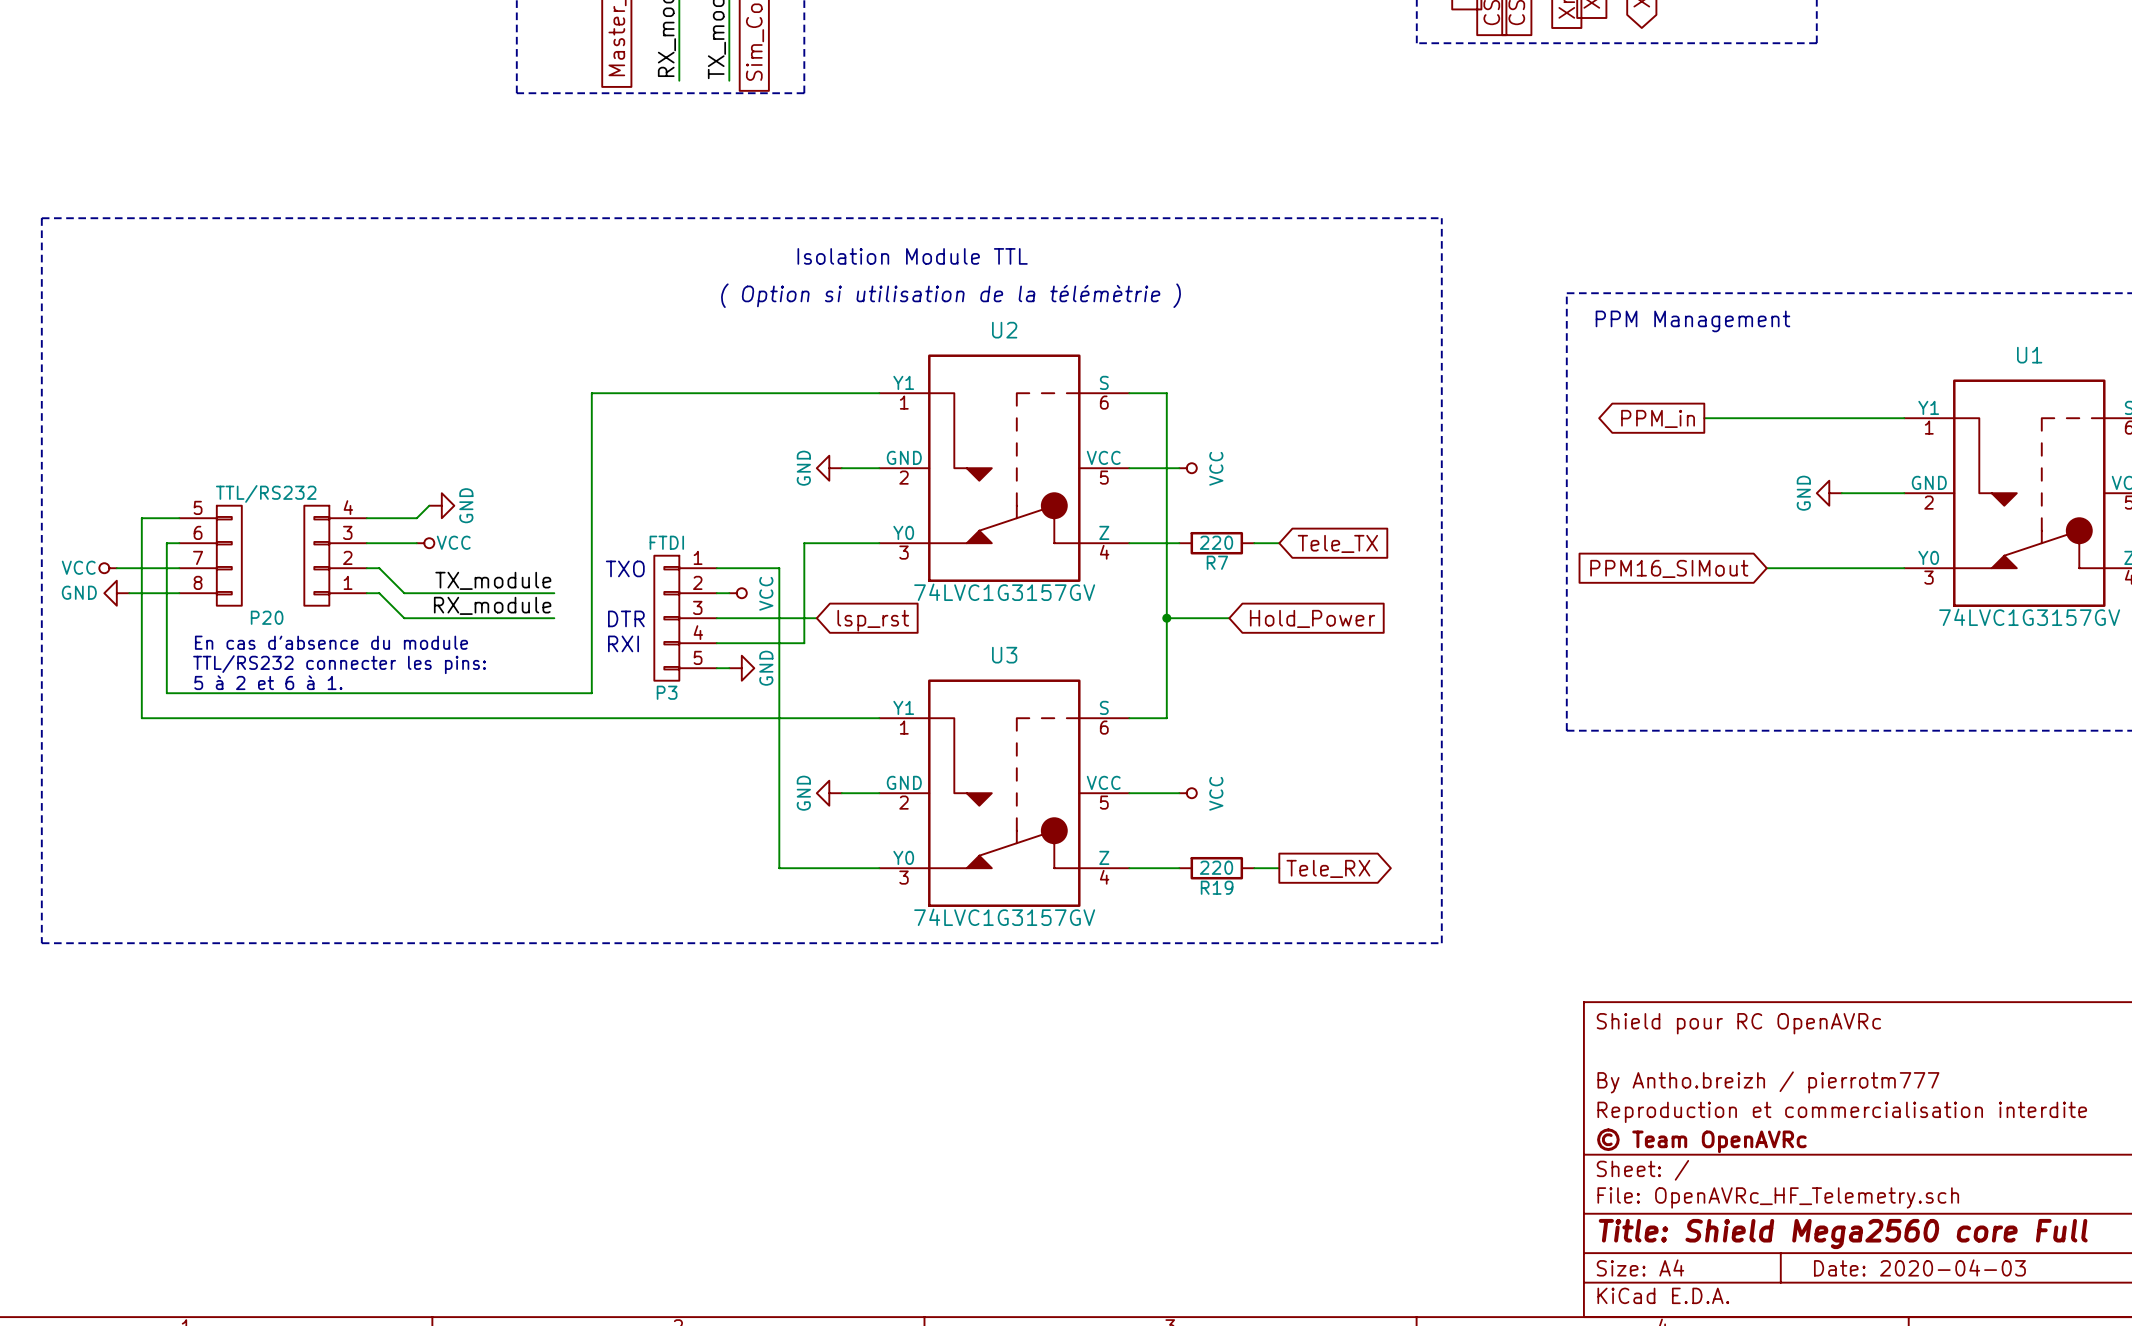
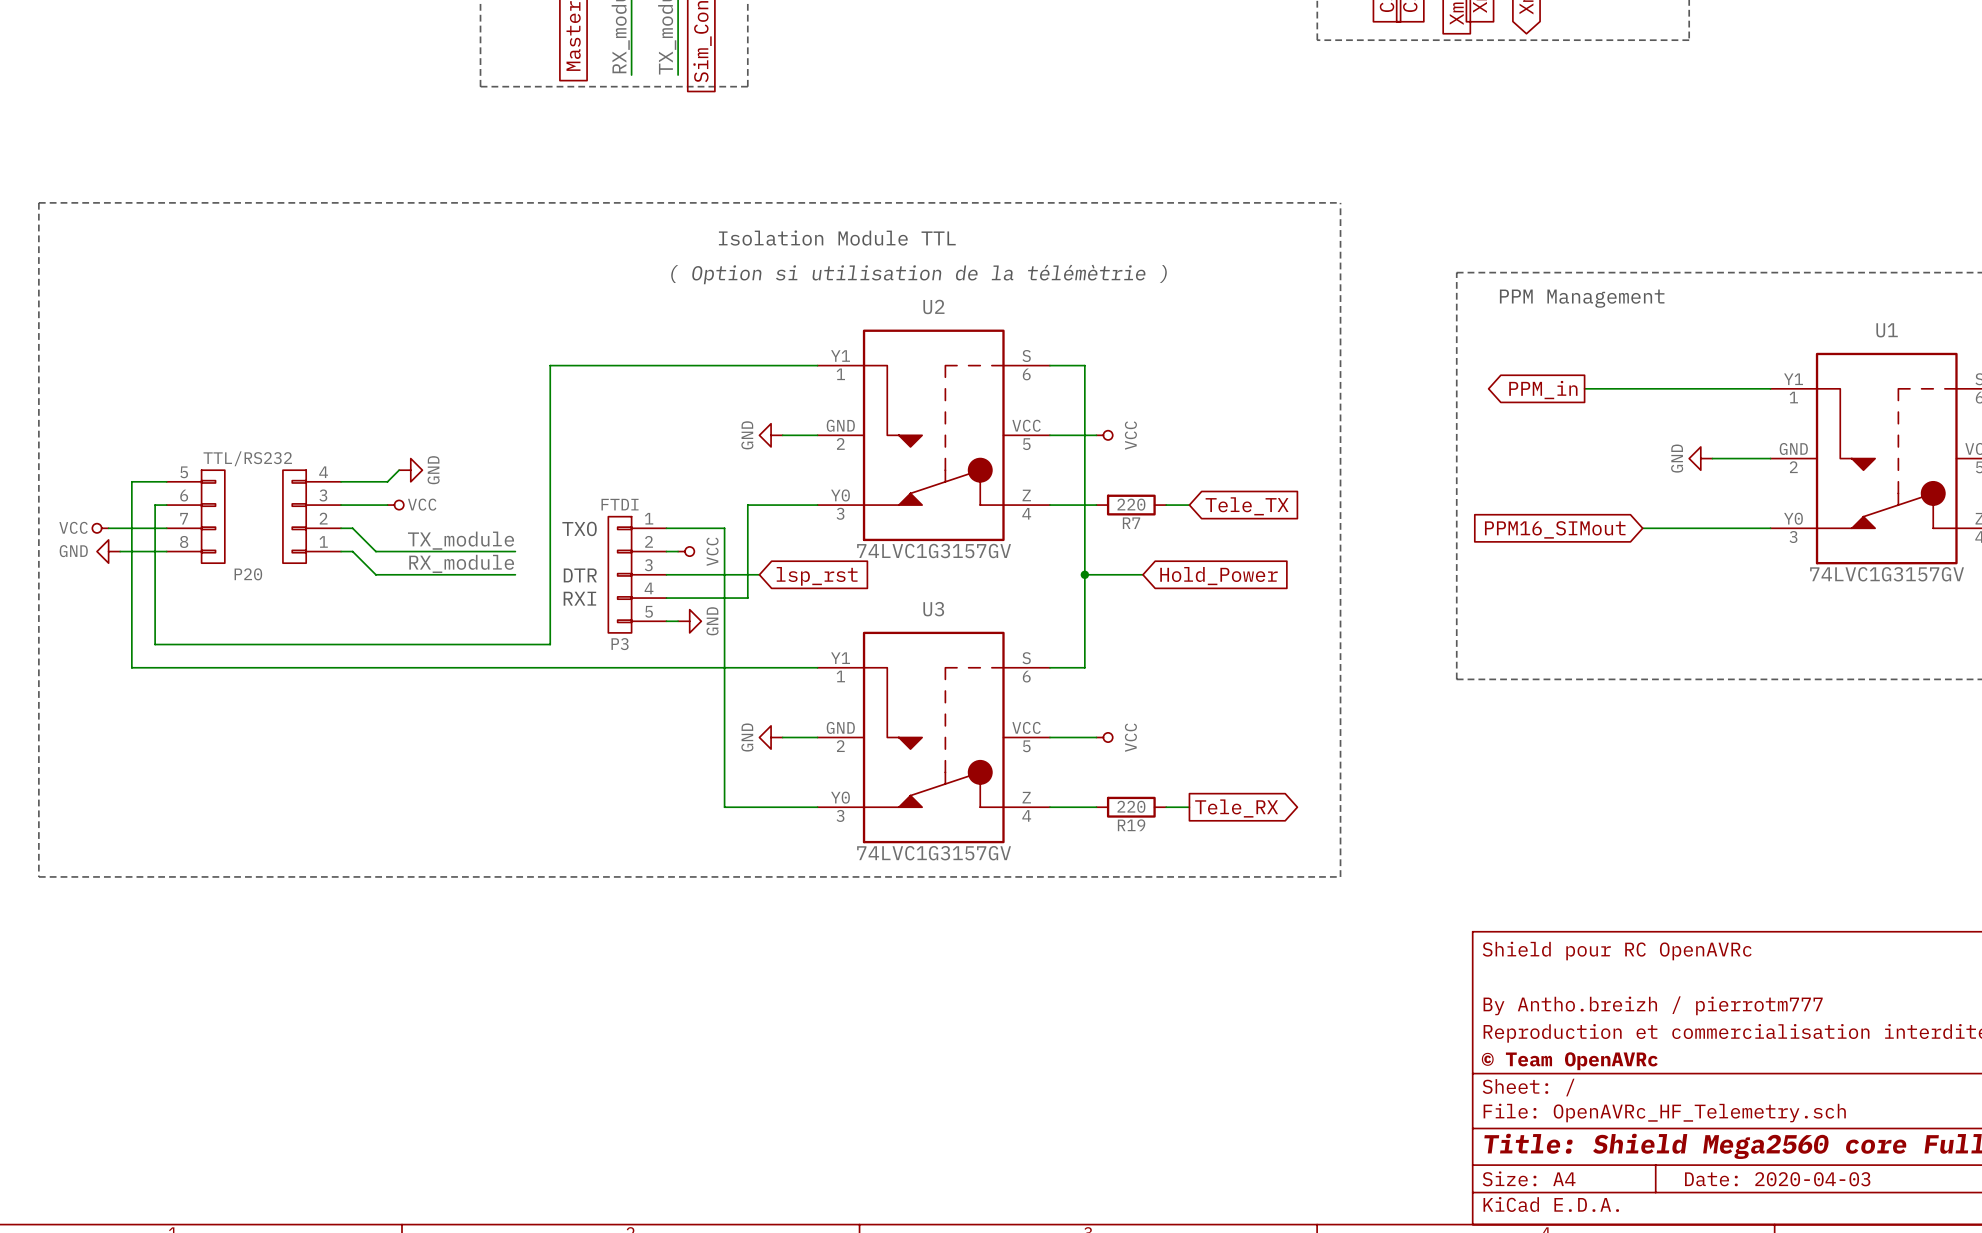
text: En cas d'absence du module (331, 642) -> none
text: TTL/RS232 connecter les pins: (339, 664) -> none
text: 5 à 2 et 6 à 1. (268, 682) -> none

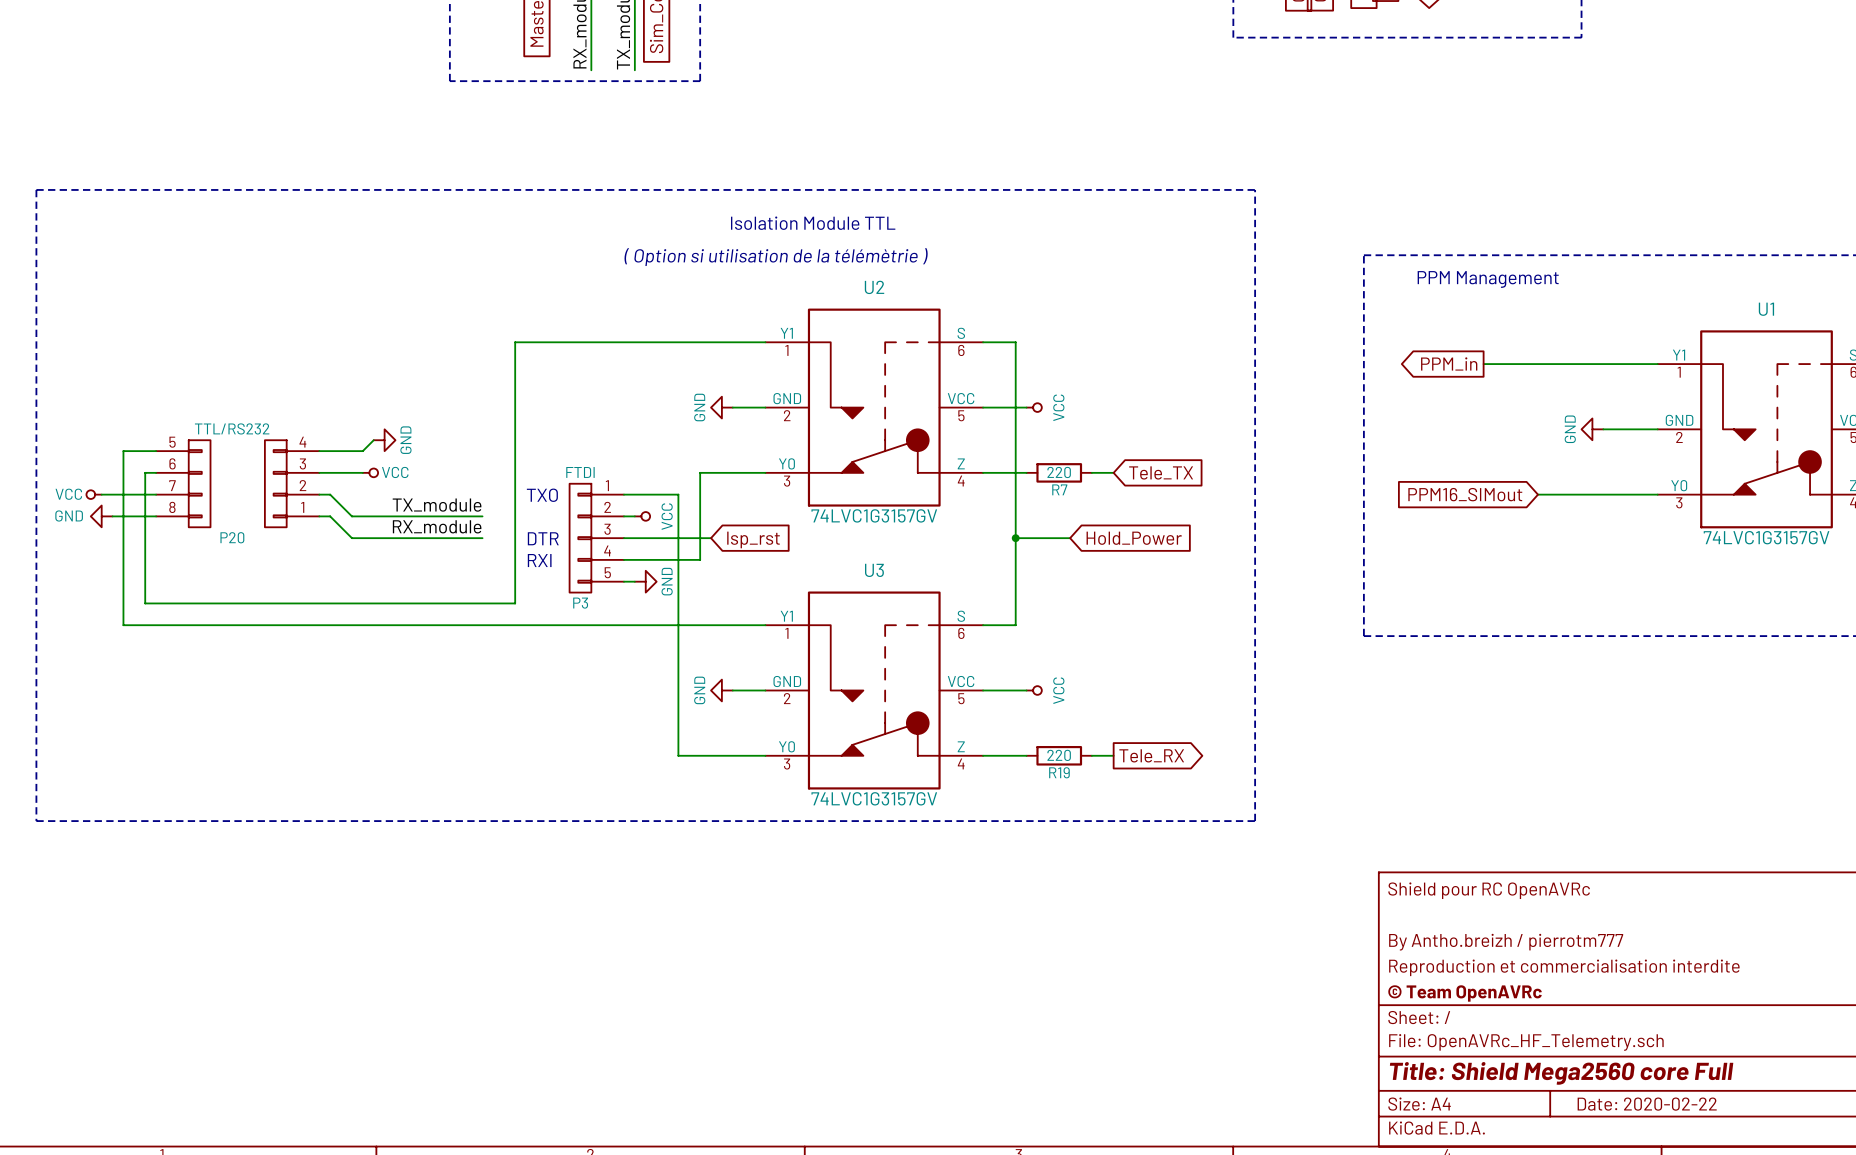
title block: Date: 2020-04-03 (1777, 1179) -> Date: 2020-02-22 (1647, 1104)

